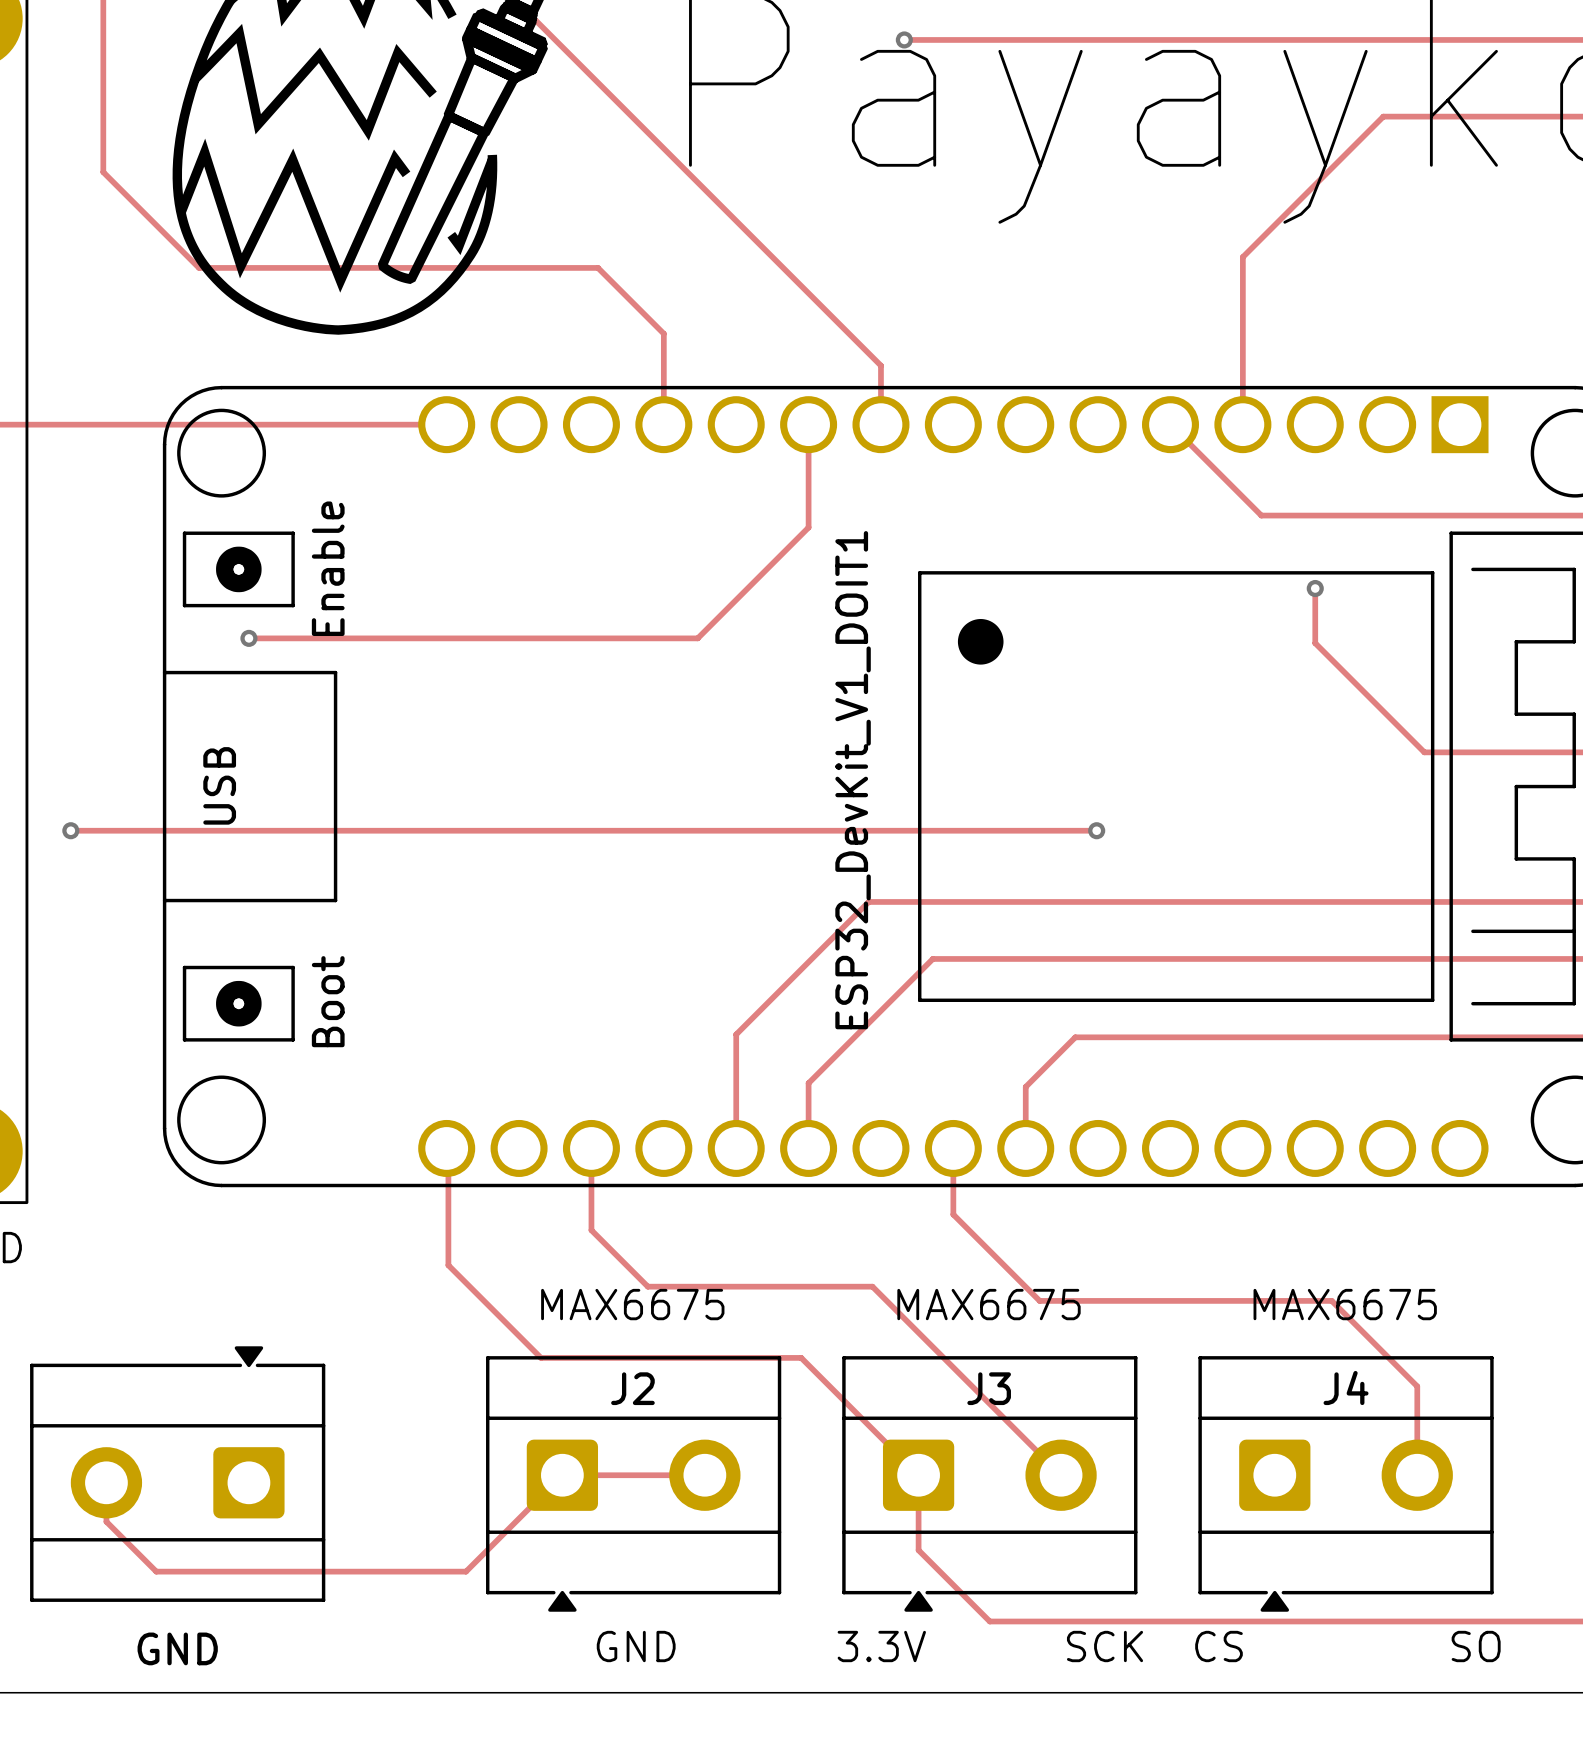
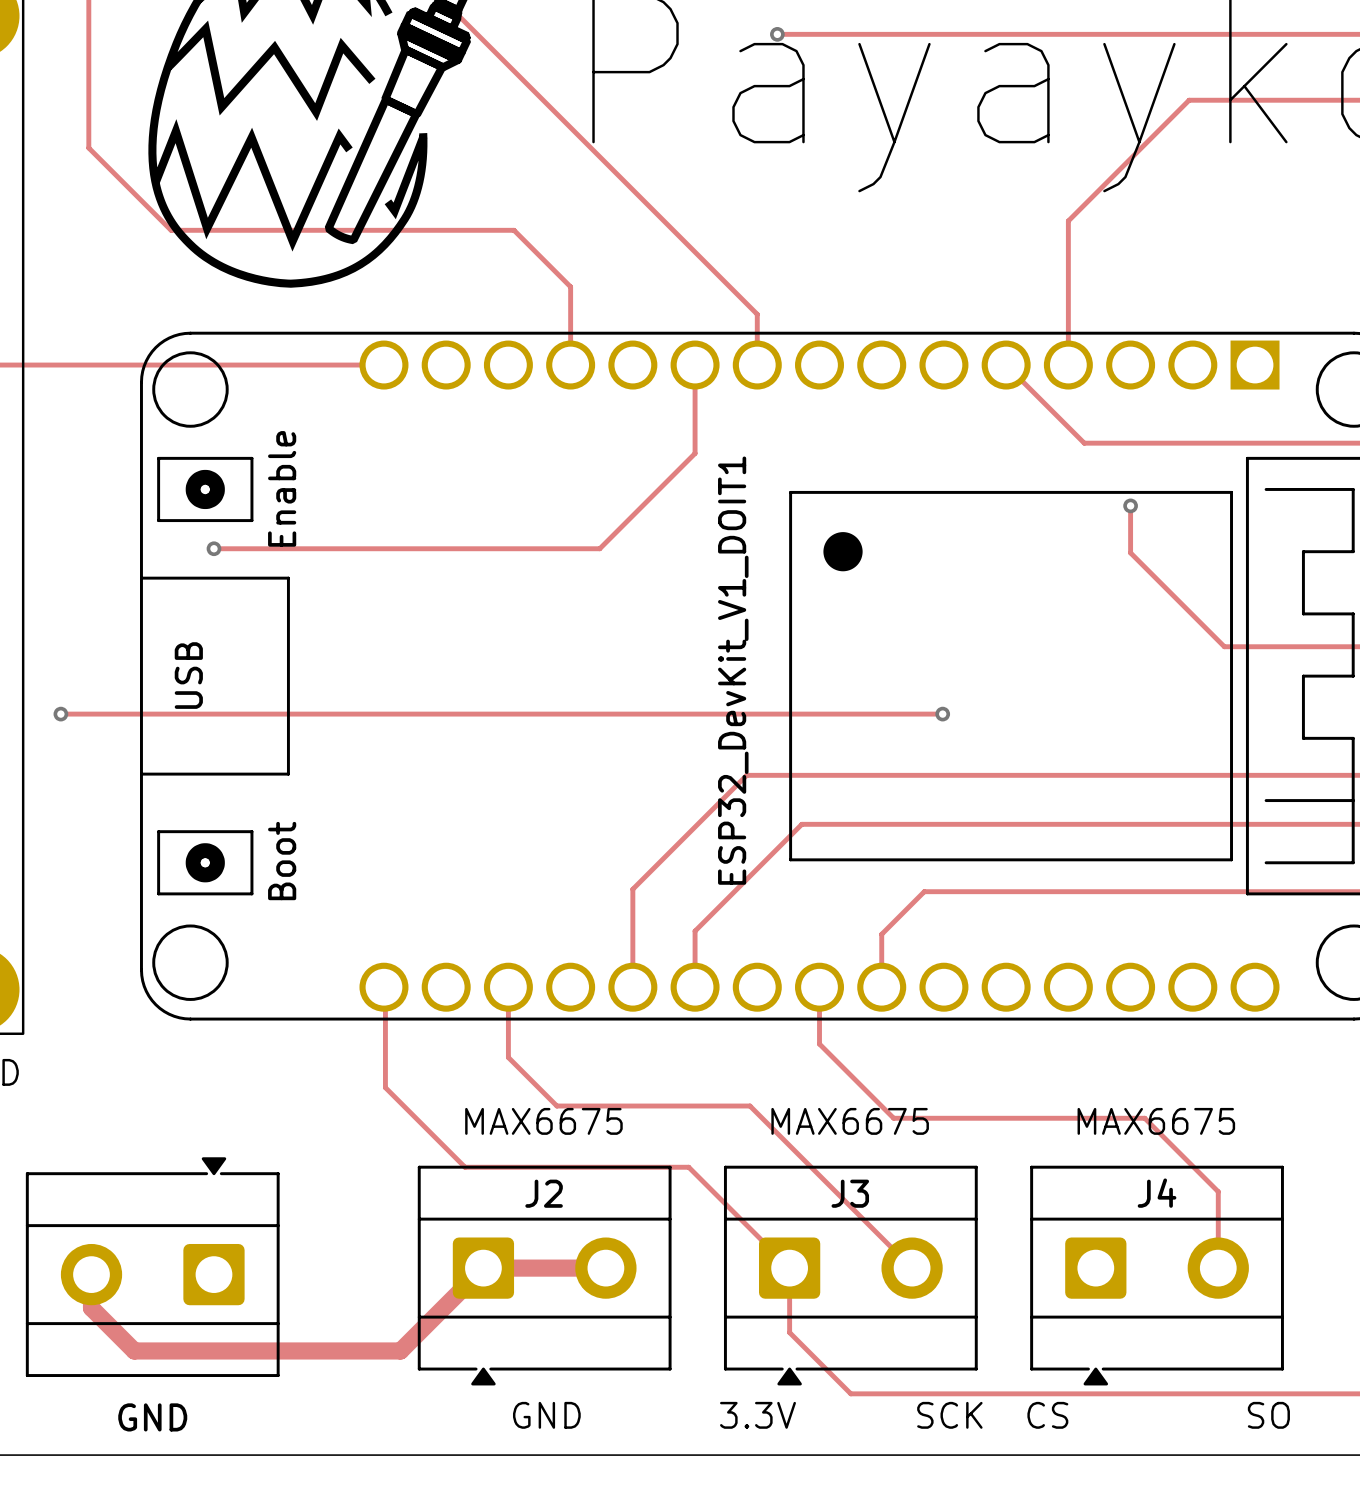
track width: thin (704, 1475) (562, 1475) (466, 1571) (156, 1571) (106, 1521) (106, 1482) -> thick (605, 1268) (483, 1268) (400, 1350) (134, 1350) (91, 1308) (91, 1274)

